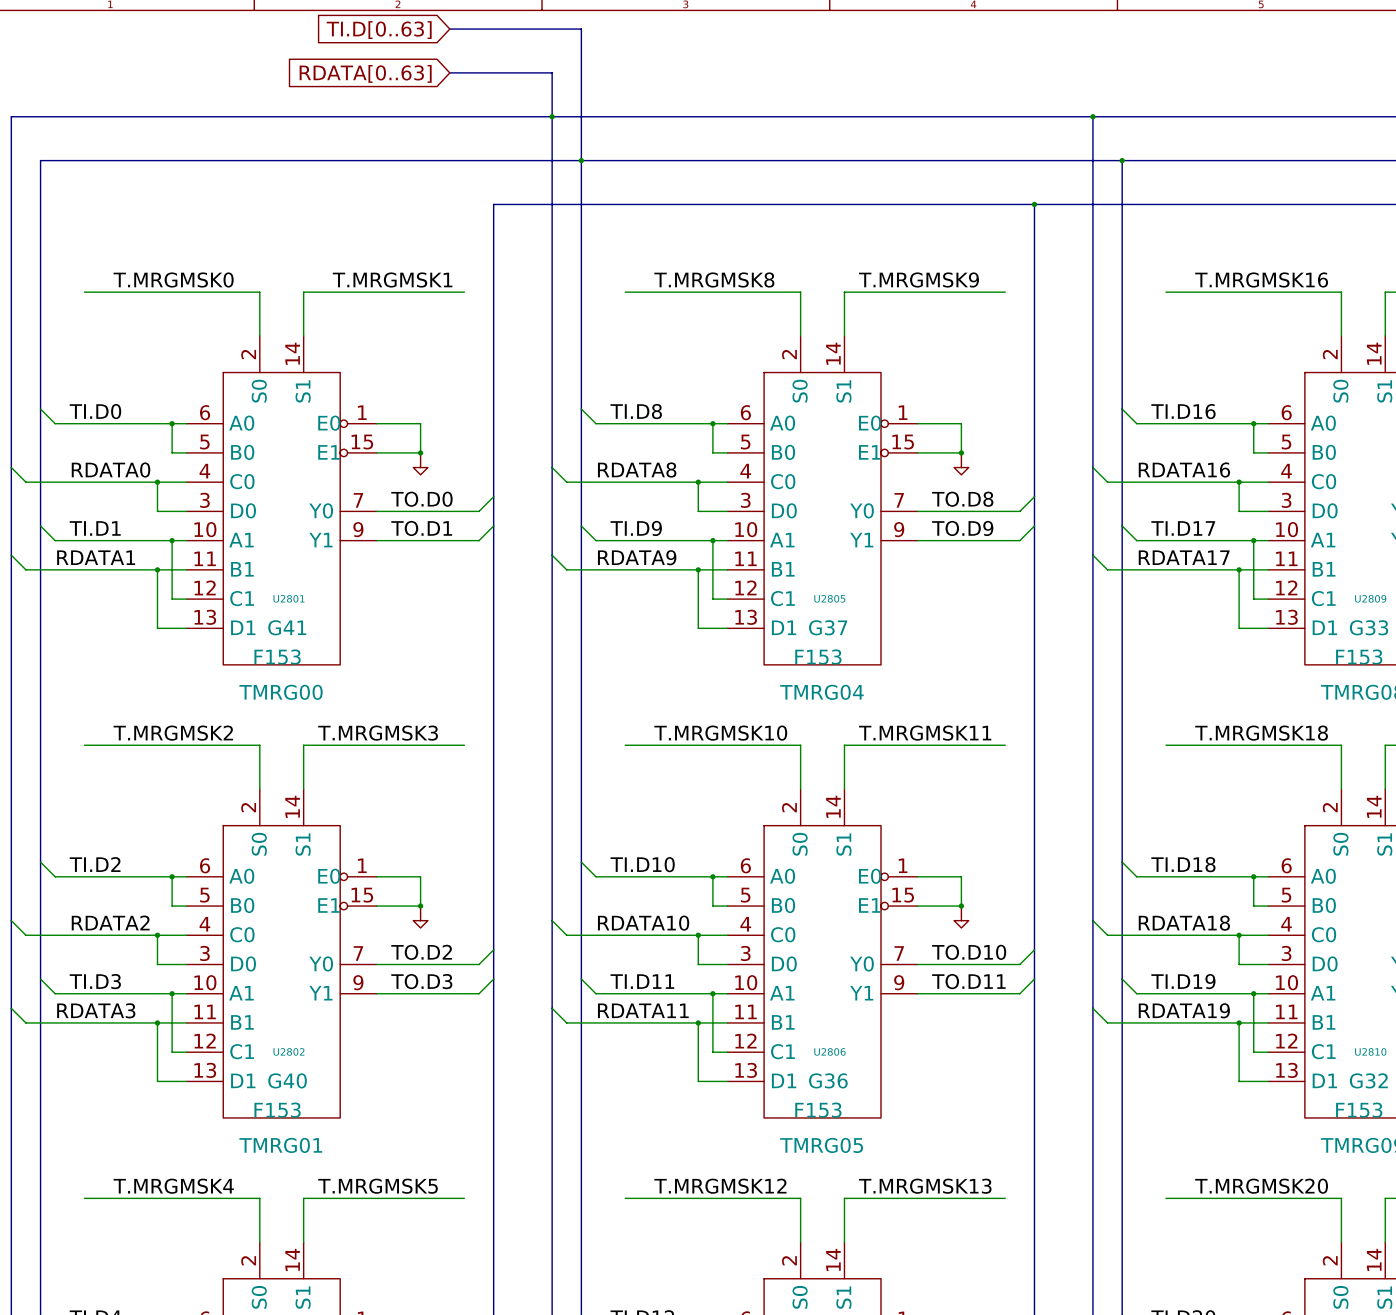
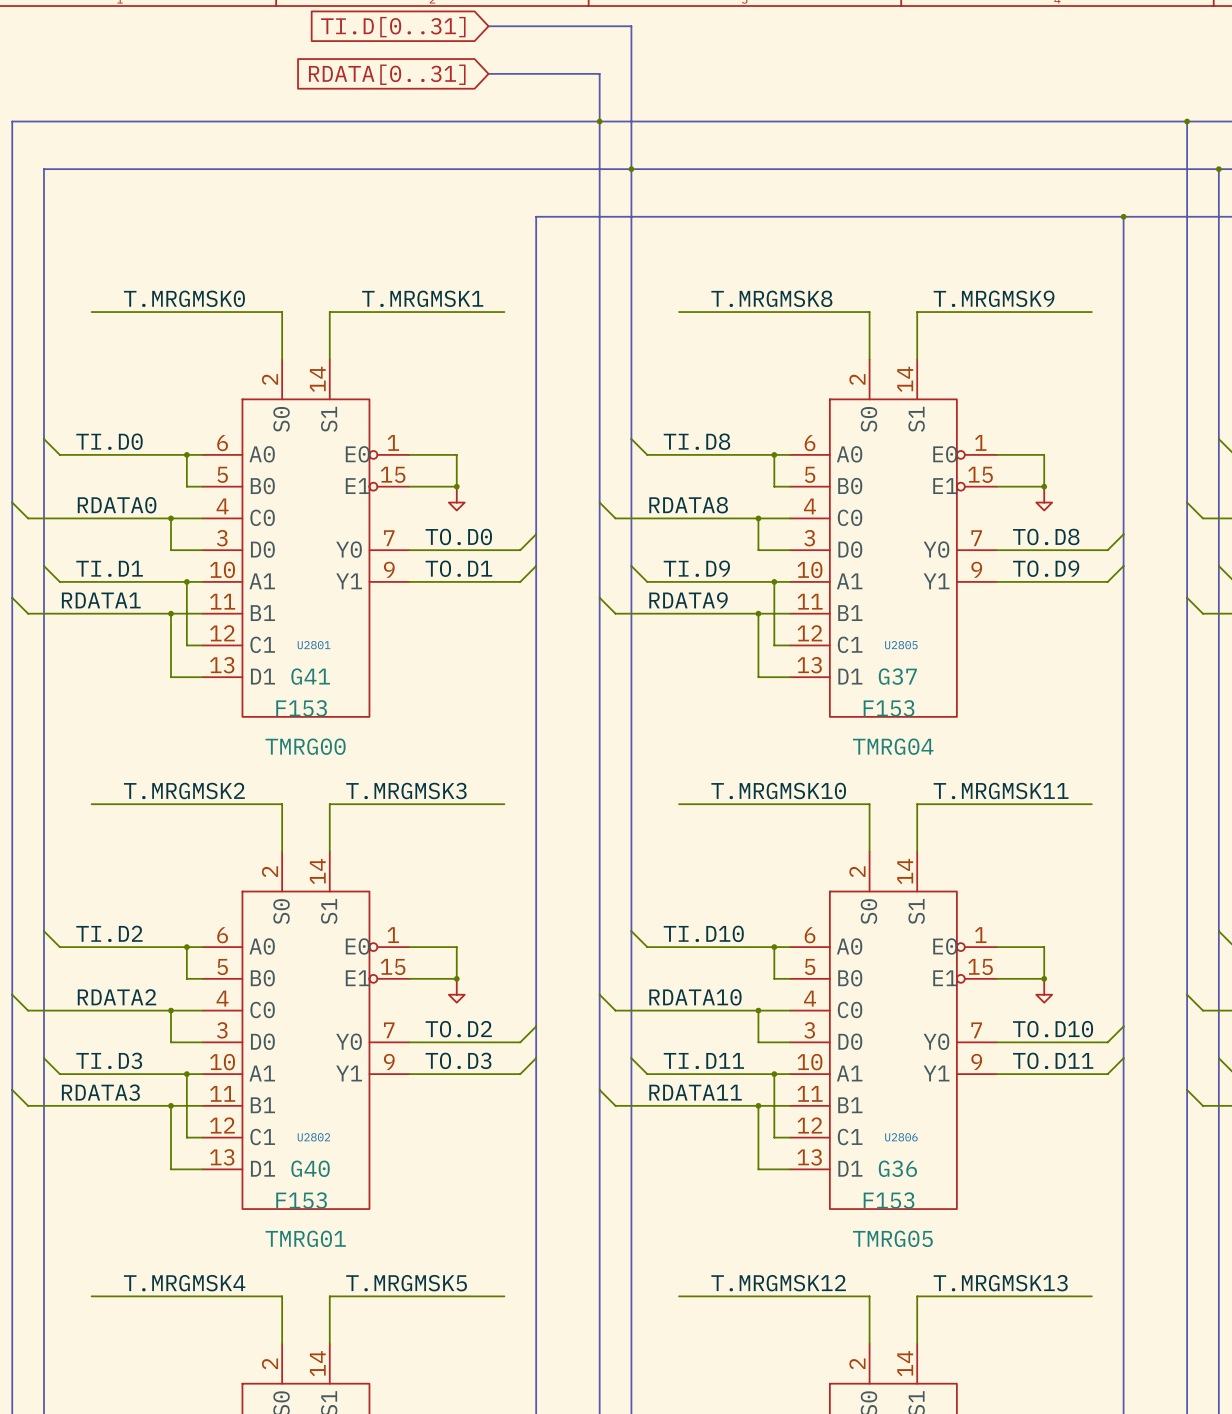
global label: TI.D[0..63] (379, 30) -> TI.D[0..31] (393, 27)
global label: RDATA[0..63] (365, 73) -> RDATA[0..31] (387, 74)

